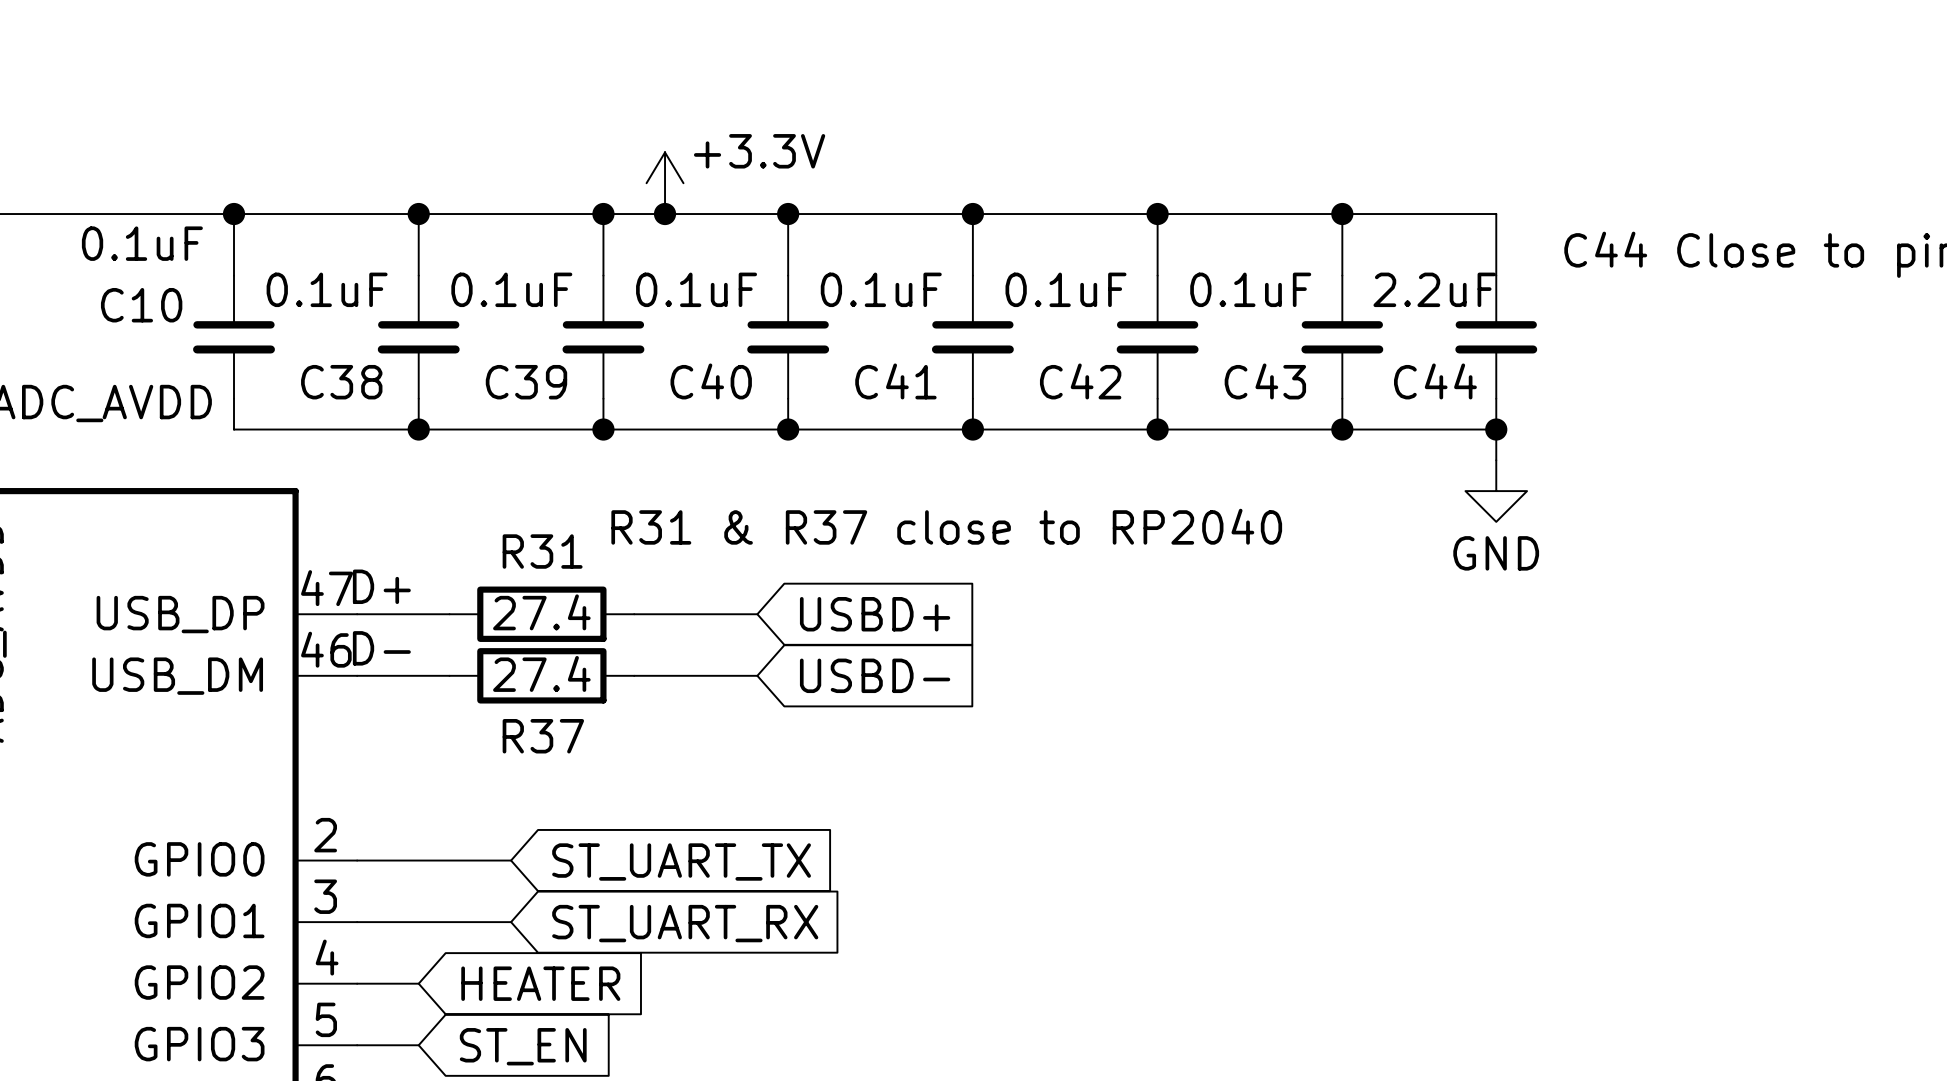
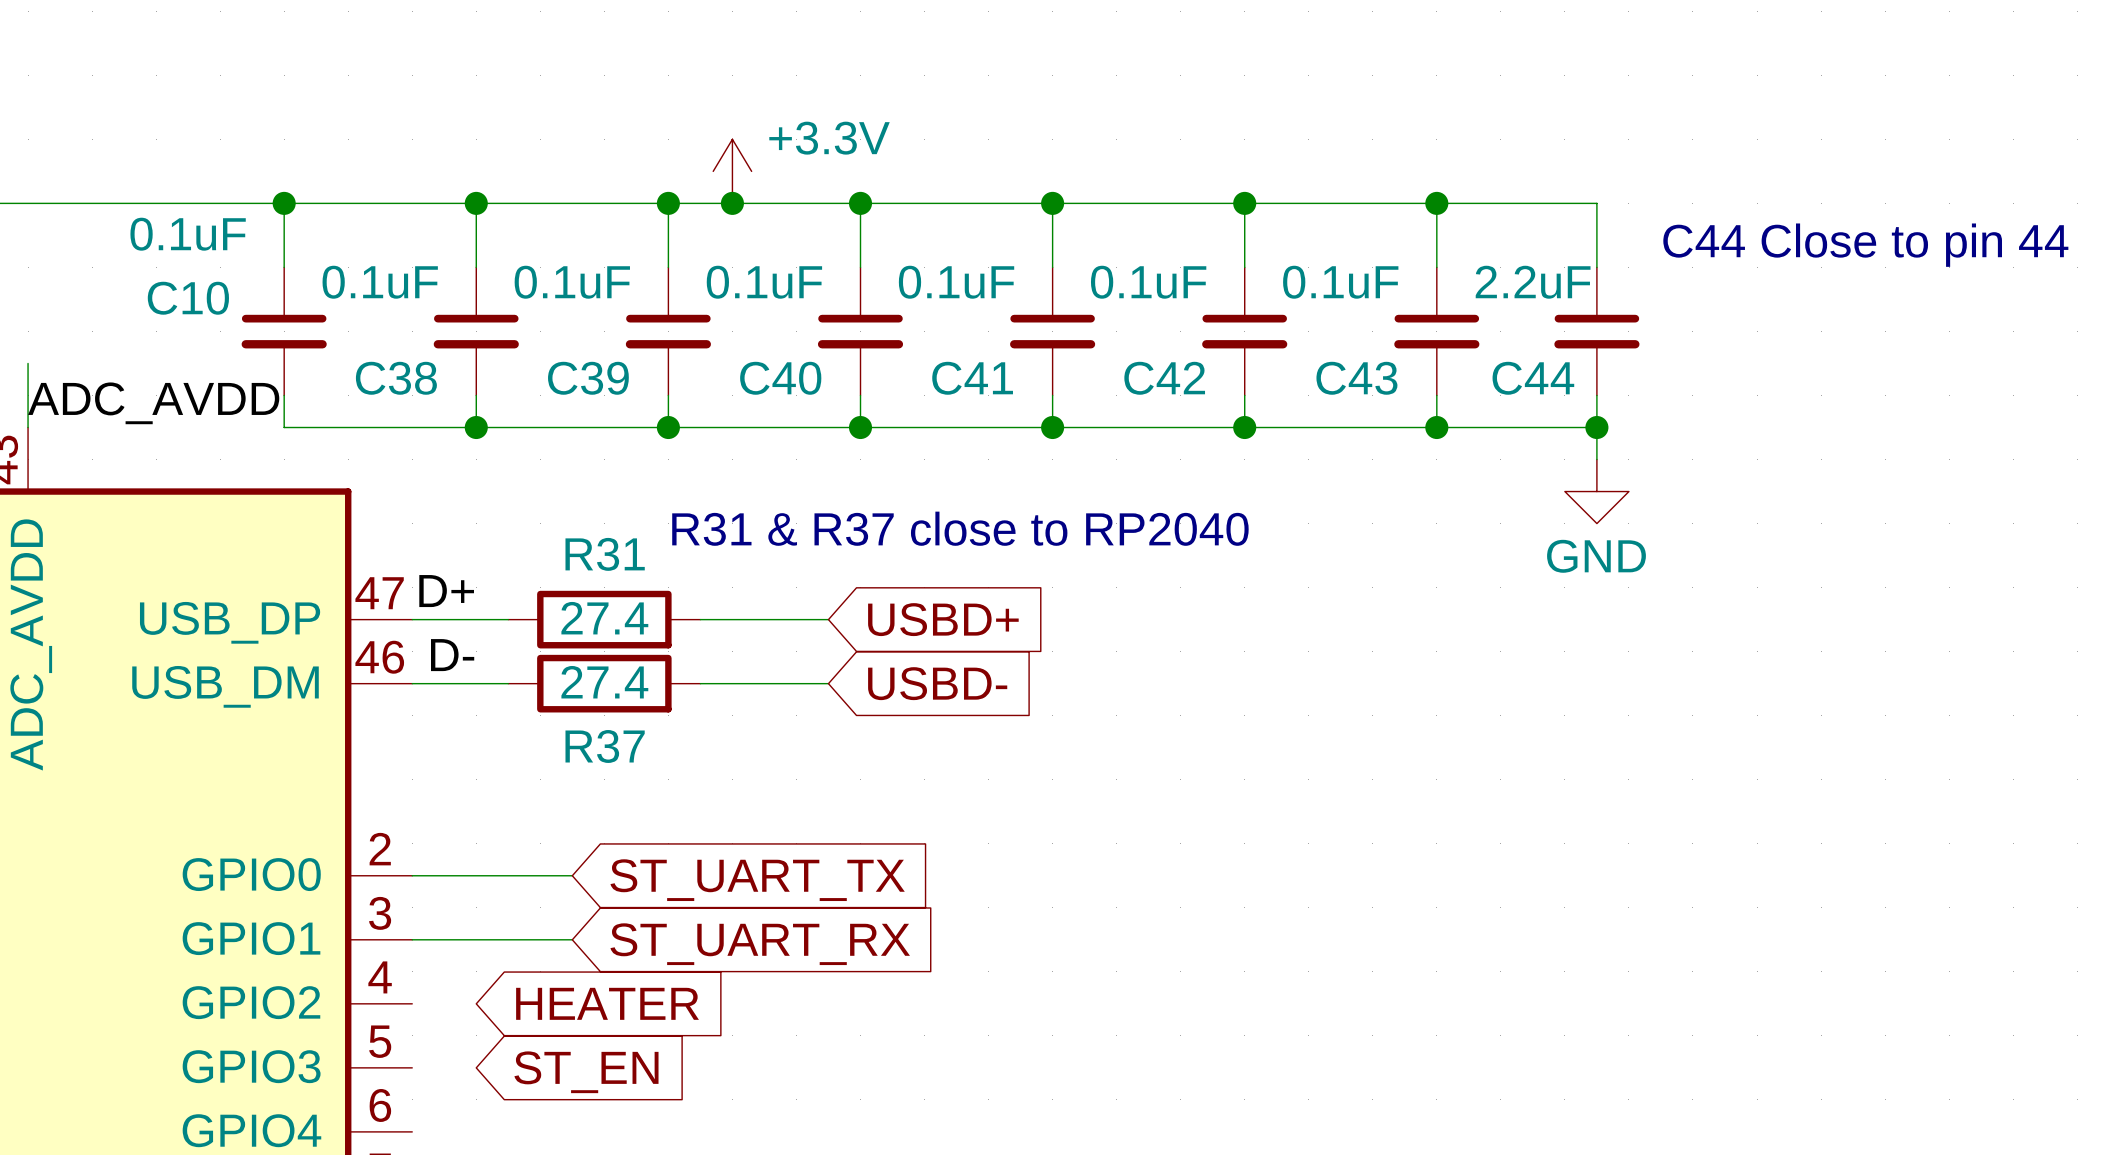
wire: (357, 983) (418, 983) -> none
wire: (357, 1045) (418, 1045) -> none

